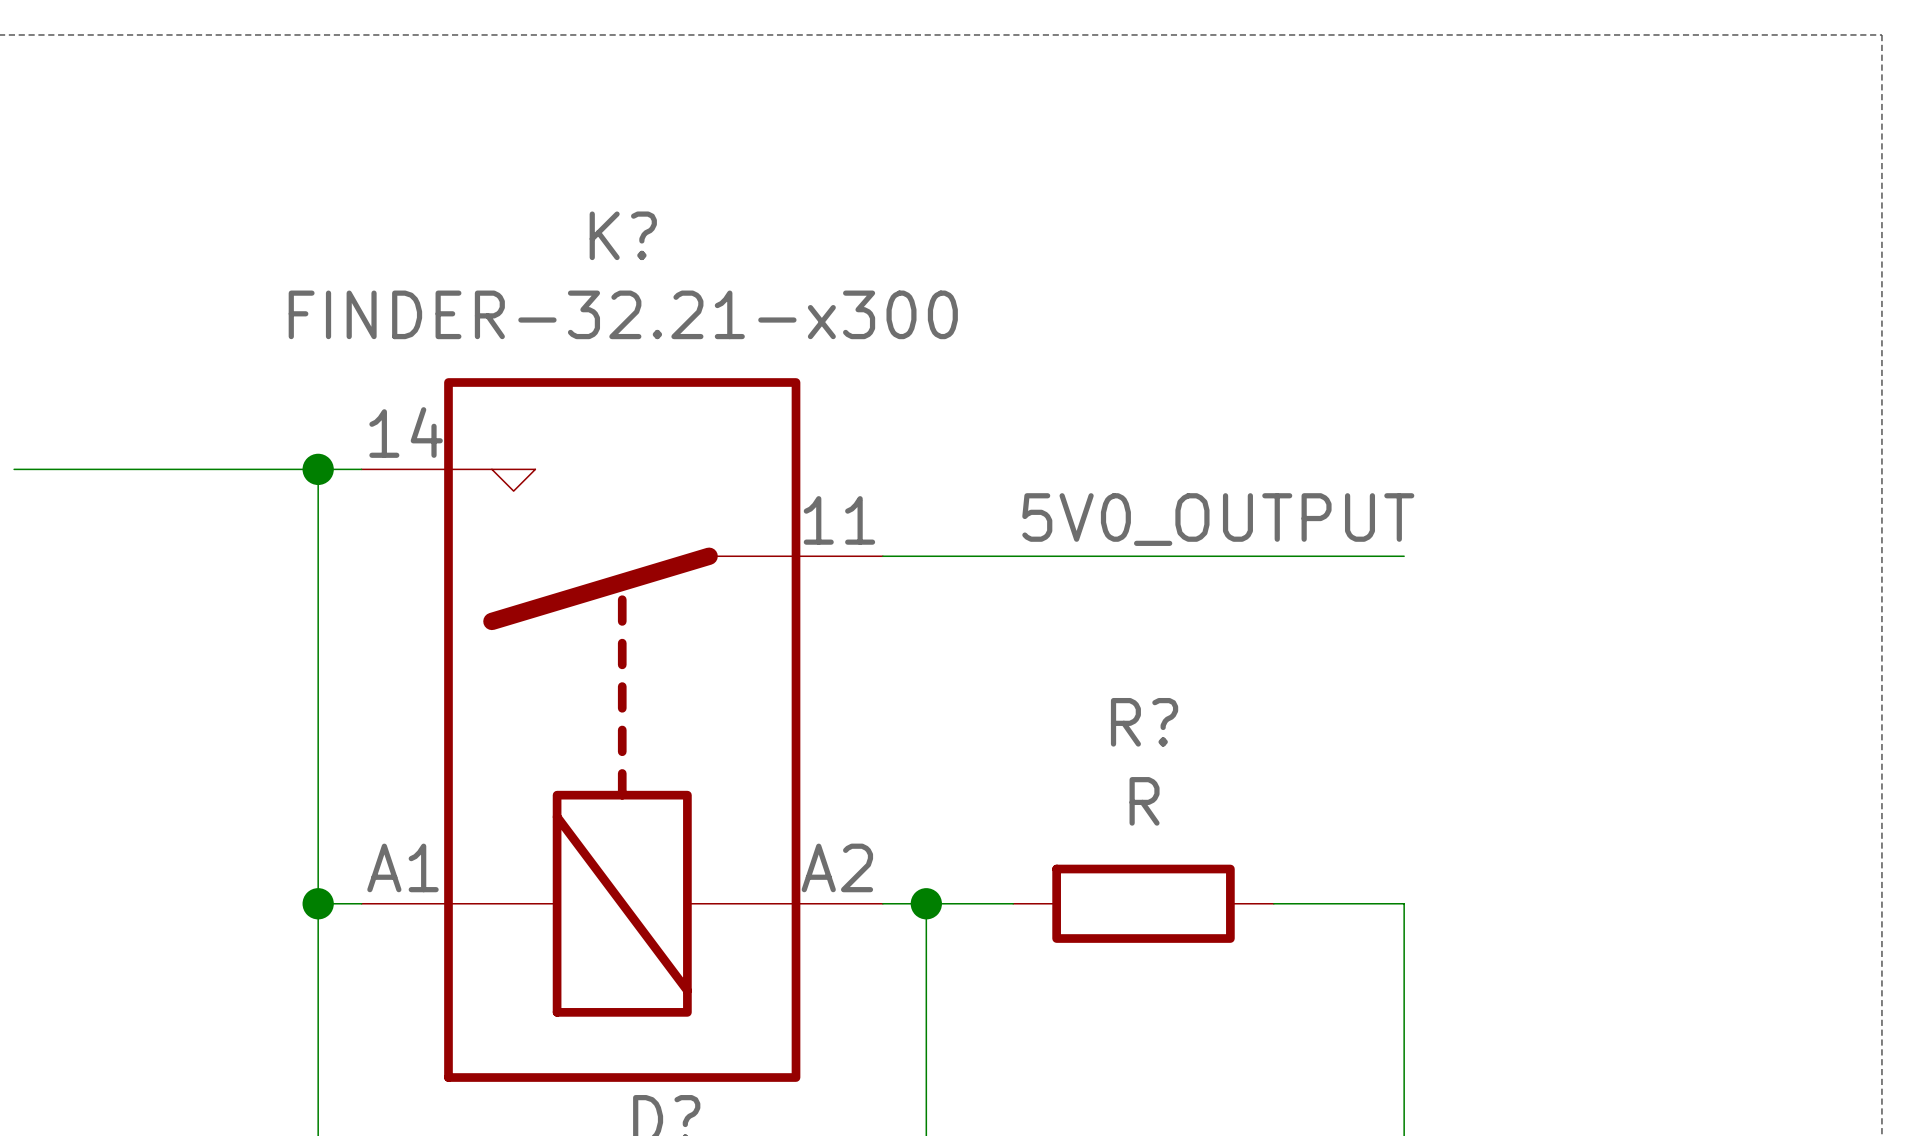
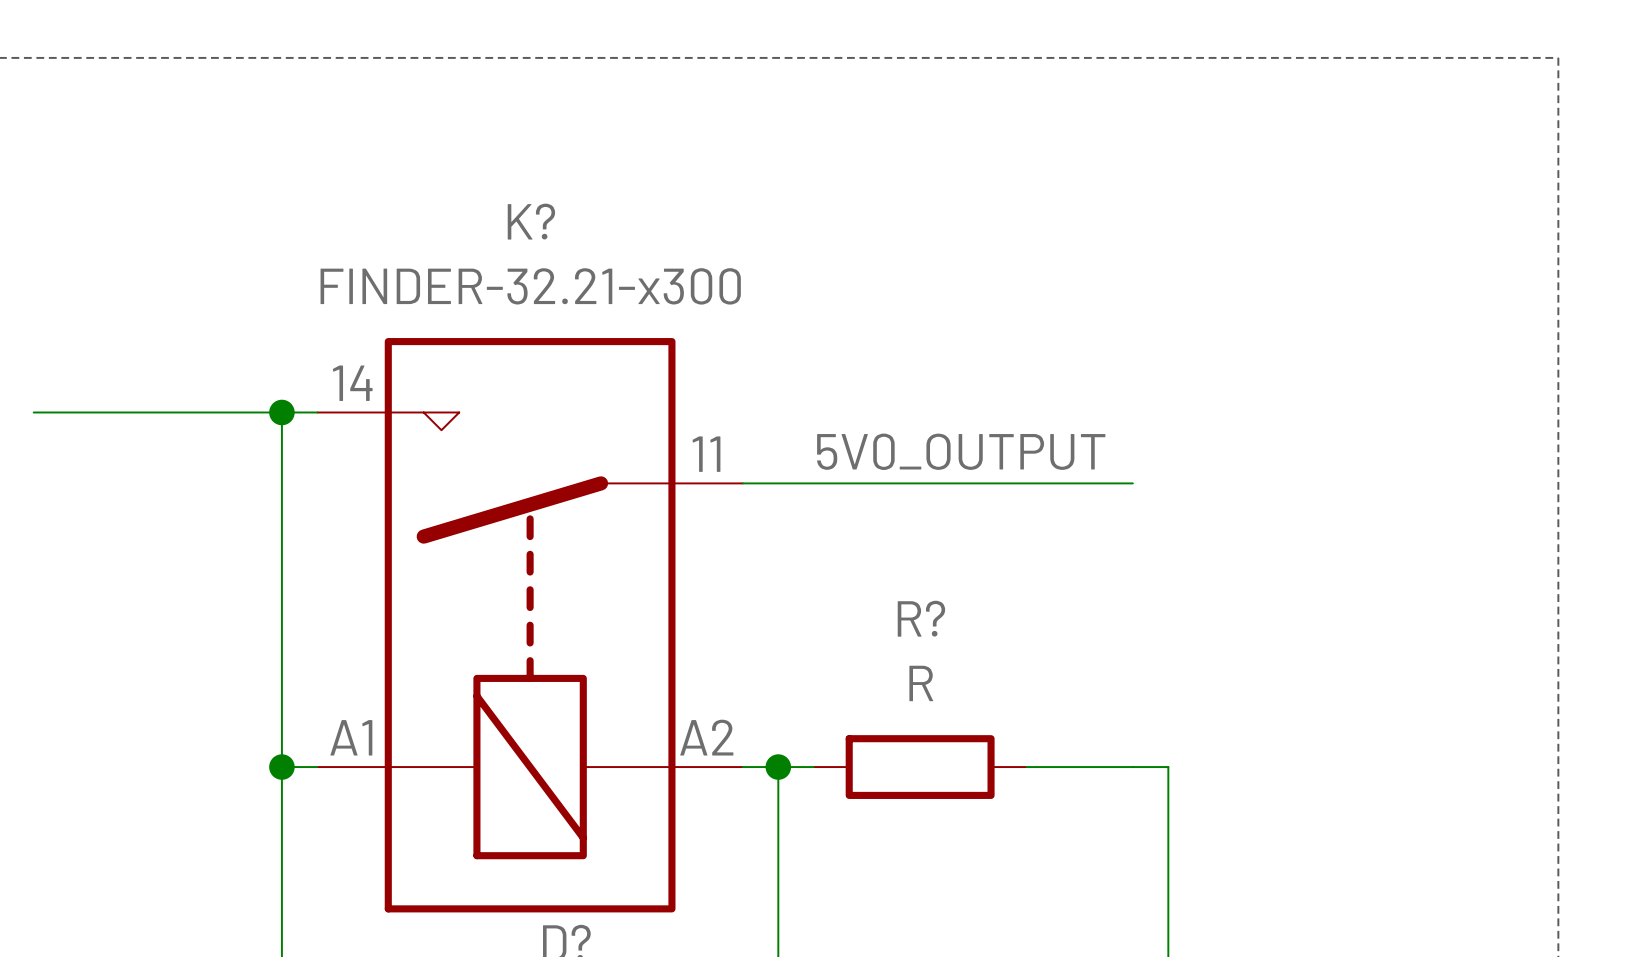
label position: 5V0_OUTPUT (1218, 519) -> 5V0_OUTPUT (961, 451)
wire: (1360, 556) (1404, 556) -> none
R? position: (1143, 903) -> (920, 767)

